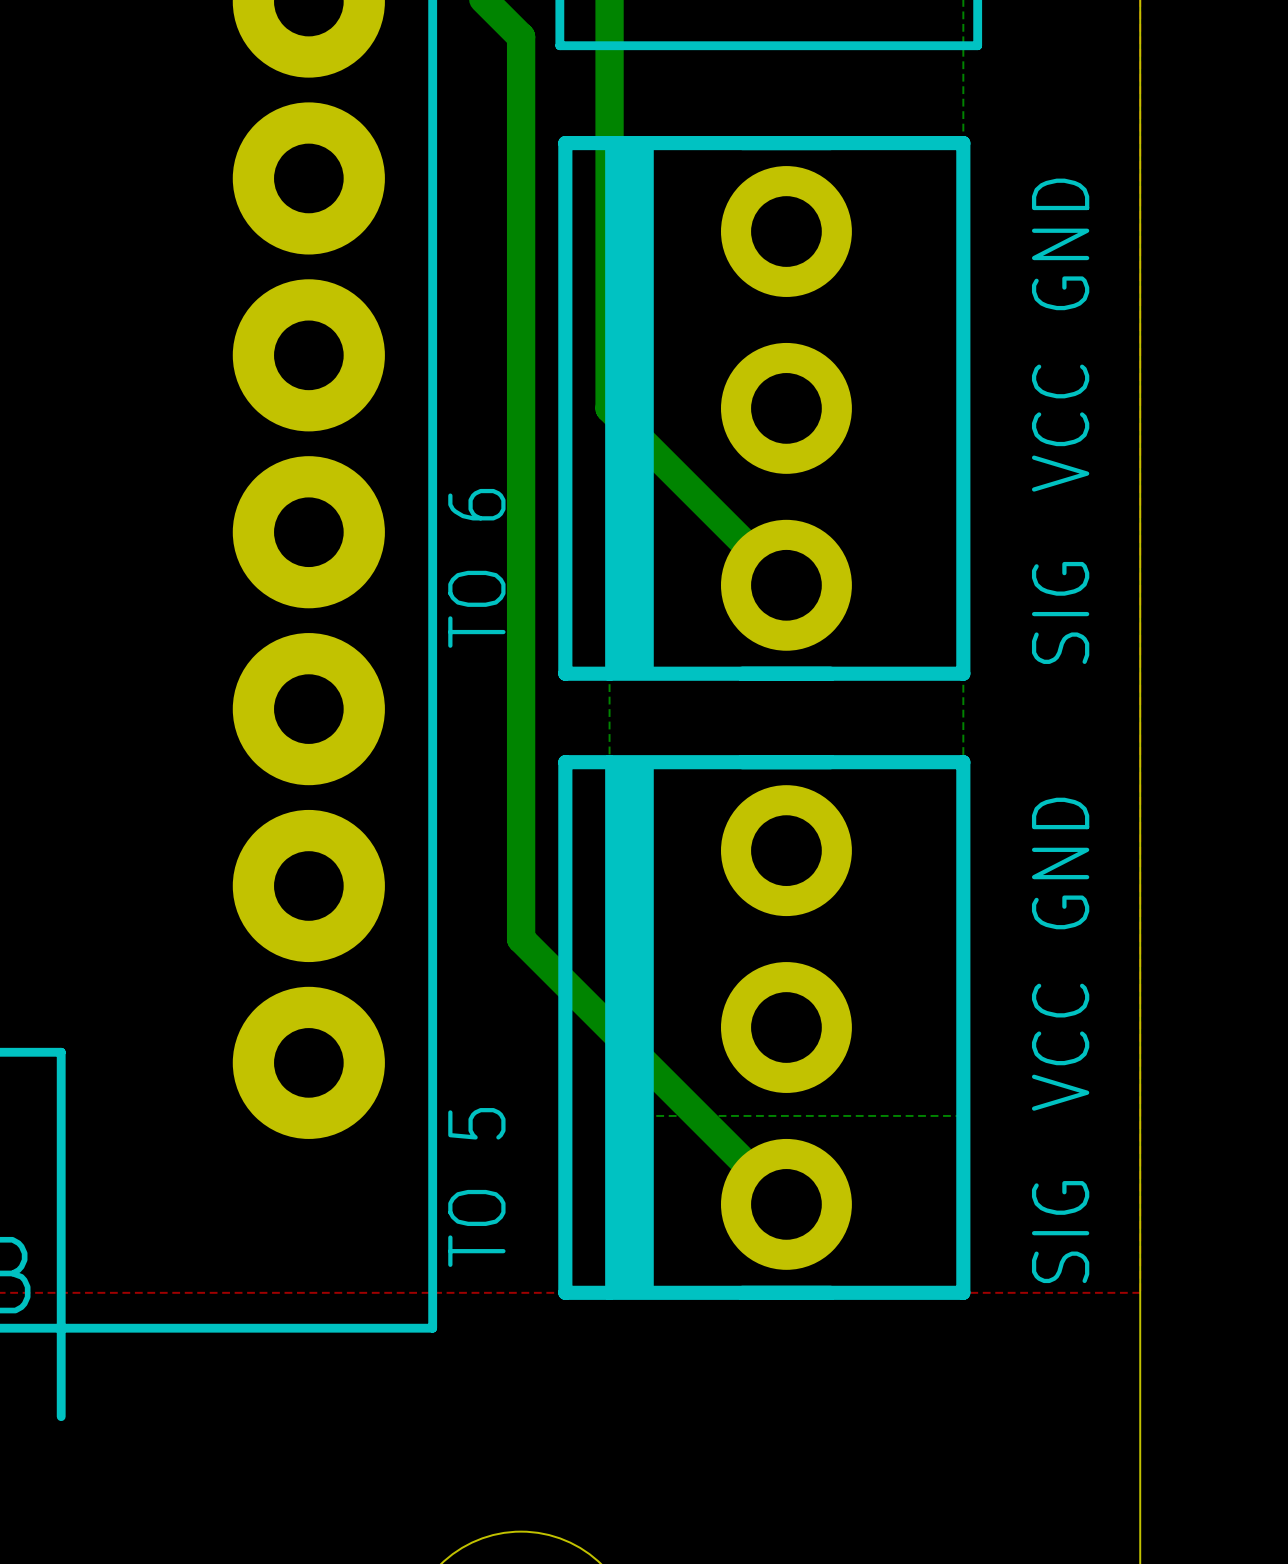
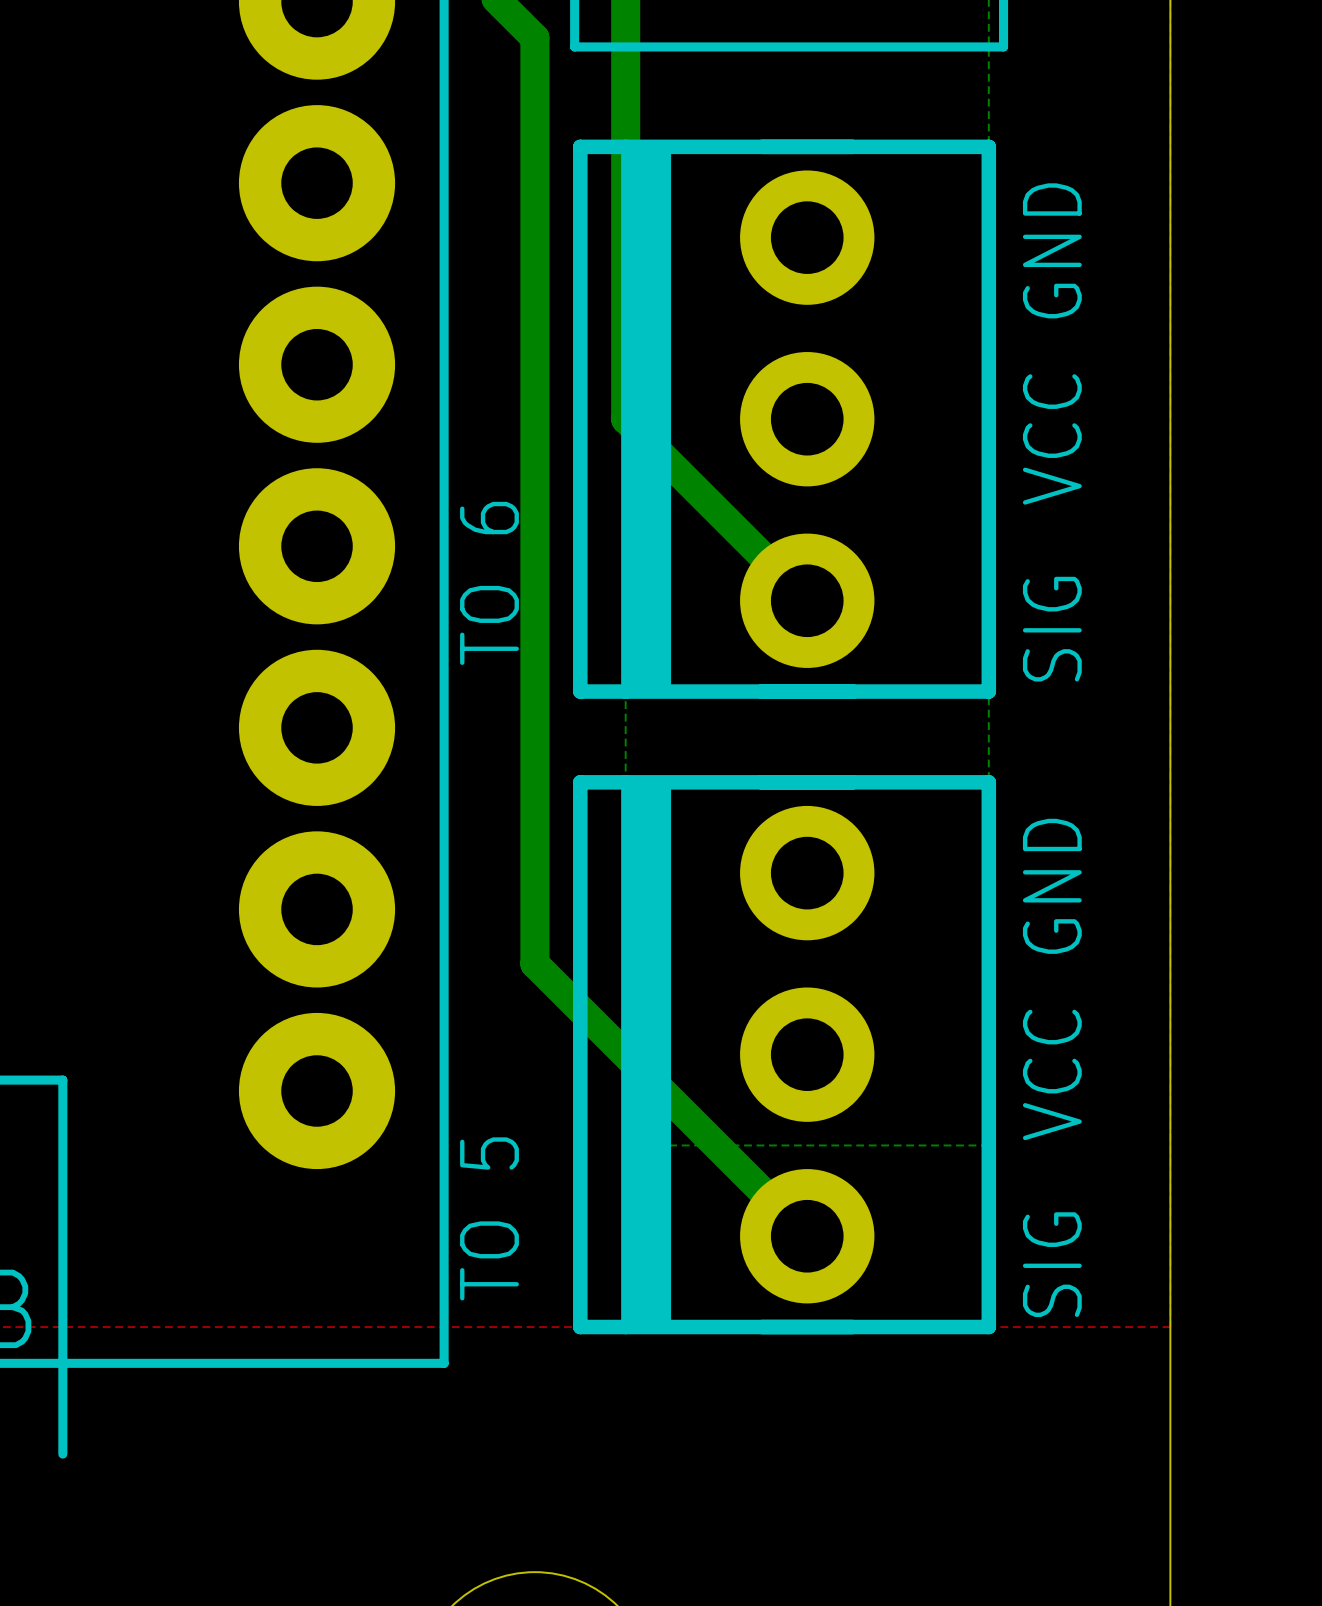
text position: GND (1060, 244) -> GND (1052, 250)
text position: VCC (1060, 428) -> VCC (1052, 439)
text position: SIG (1060, 612) -> SIG (1052, 629)
text position: GND (1060, 863) -> GND (1052, 886)
text position: VCC (1060, 1047) -> VCC (1052, 1074)
text position: SIG (1060, 1232) -> SIG (1052, 1264)

